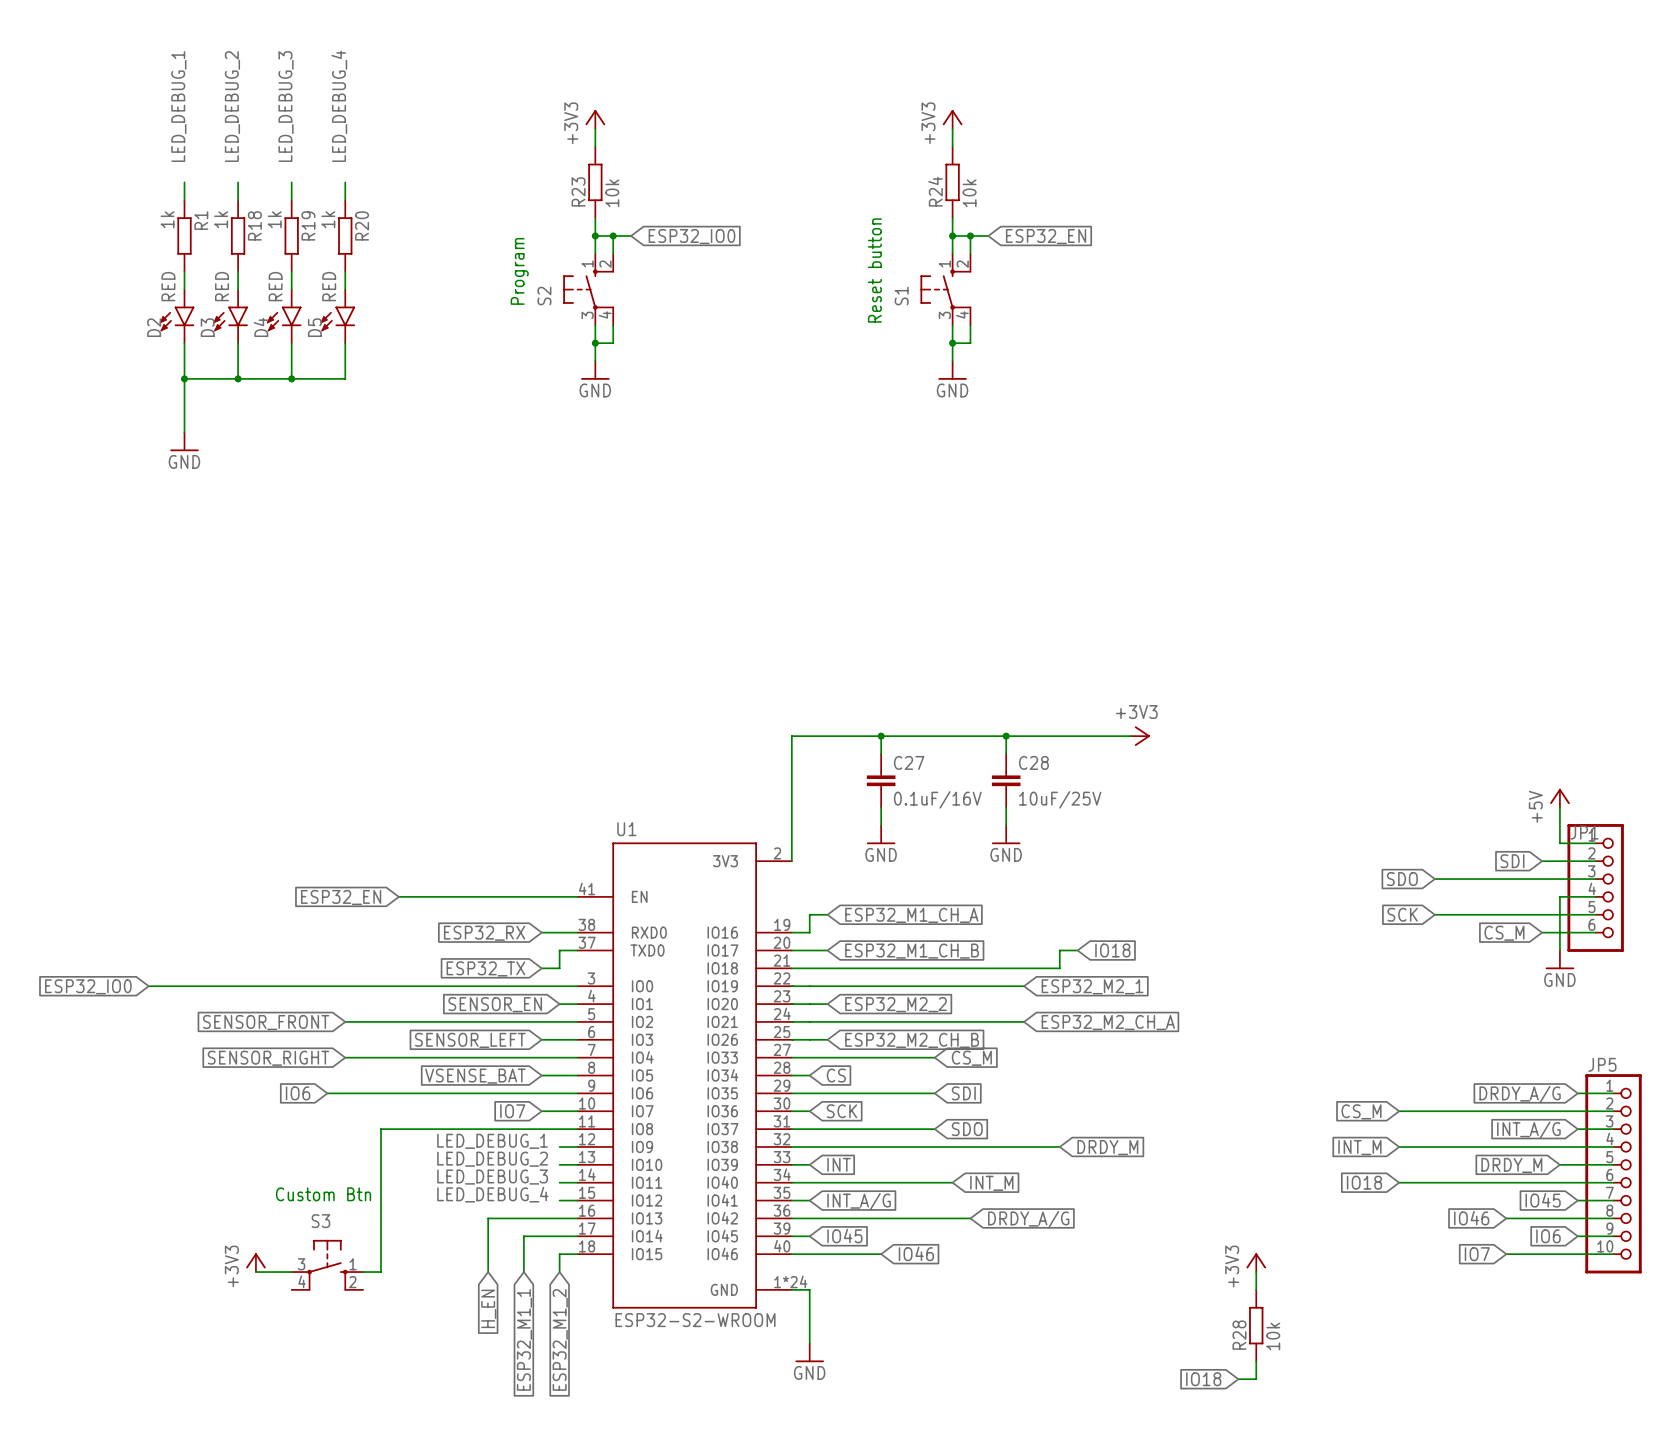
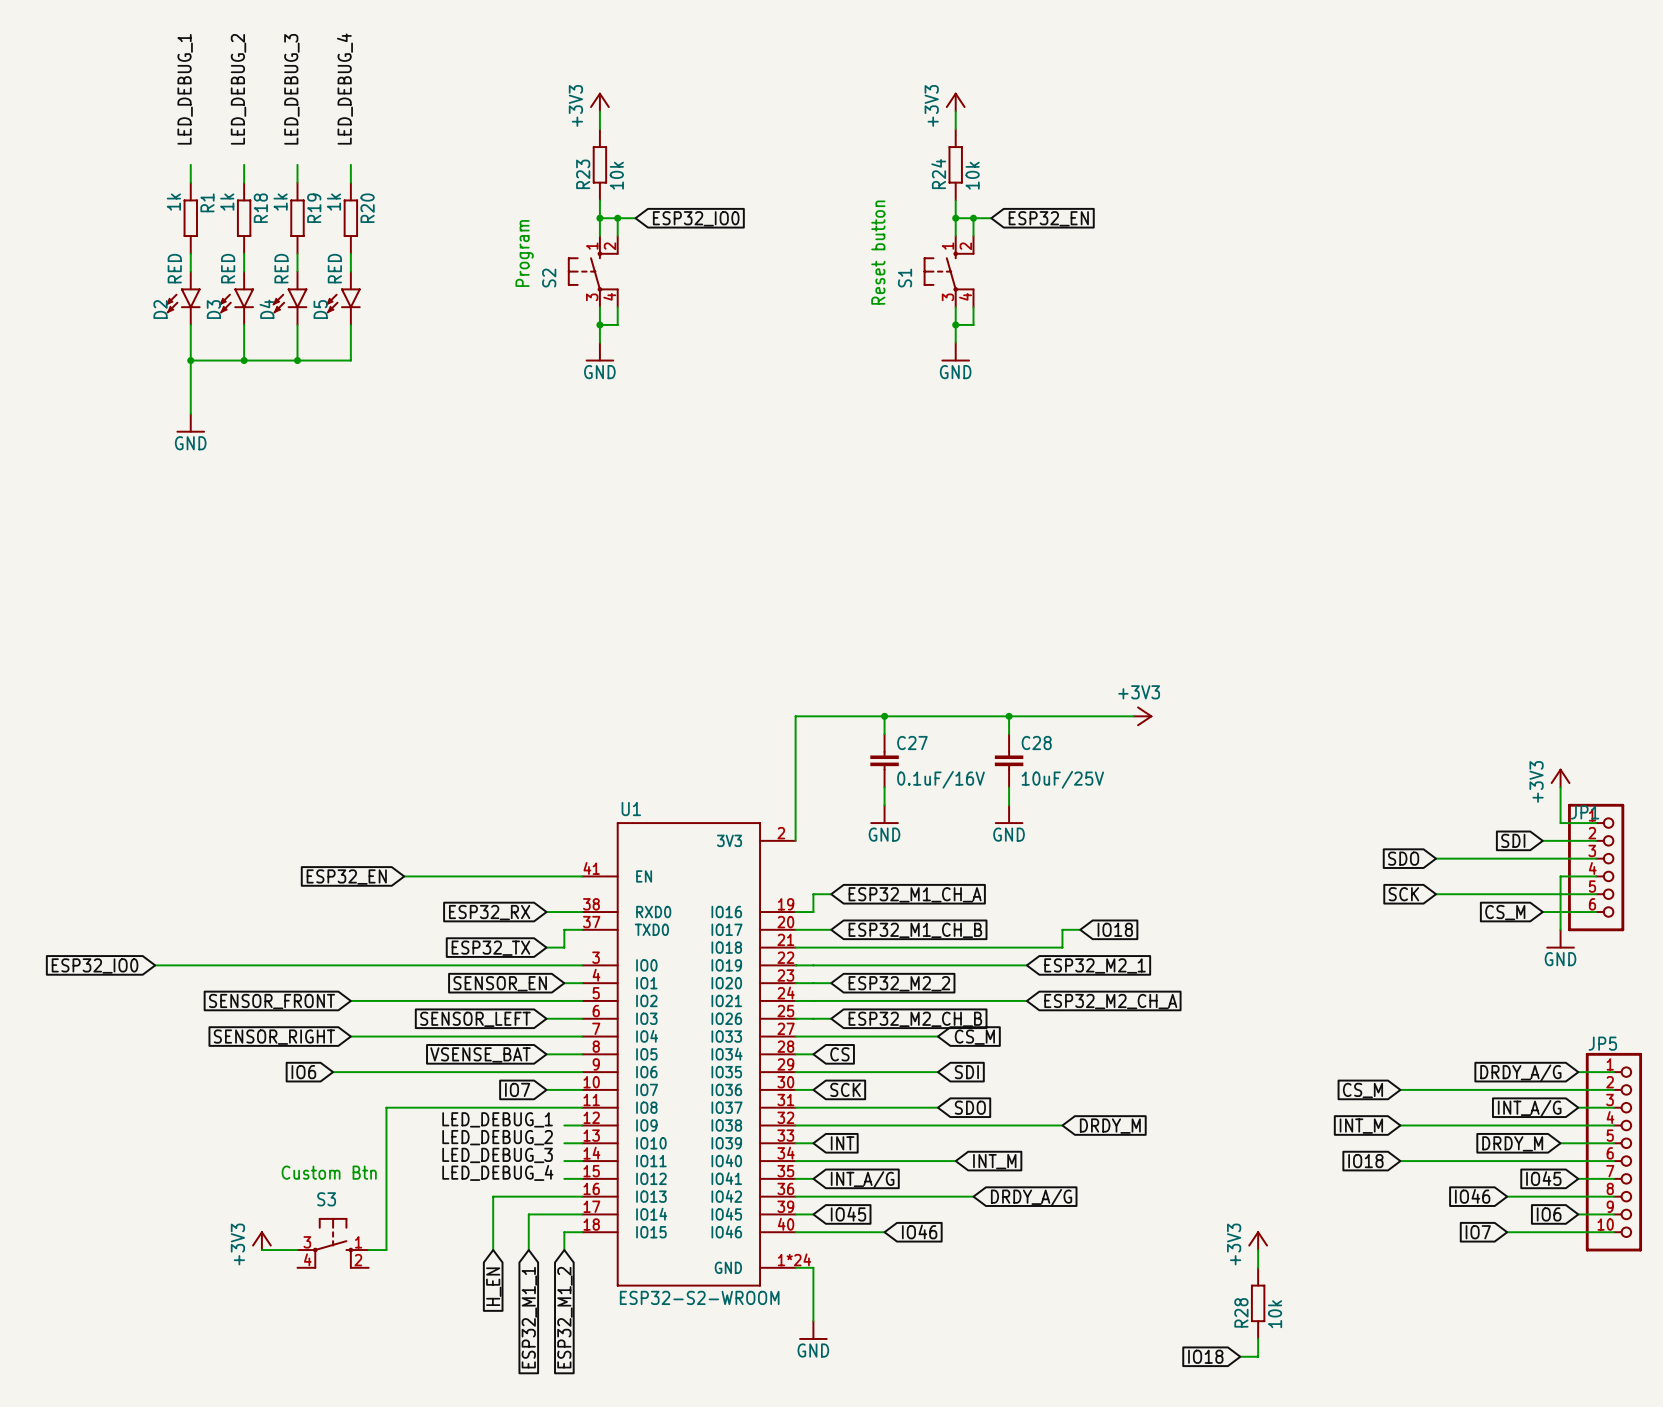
power symbol: +5V (1559, 798) -> +3V3 (1560, 778)

